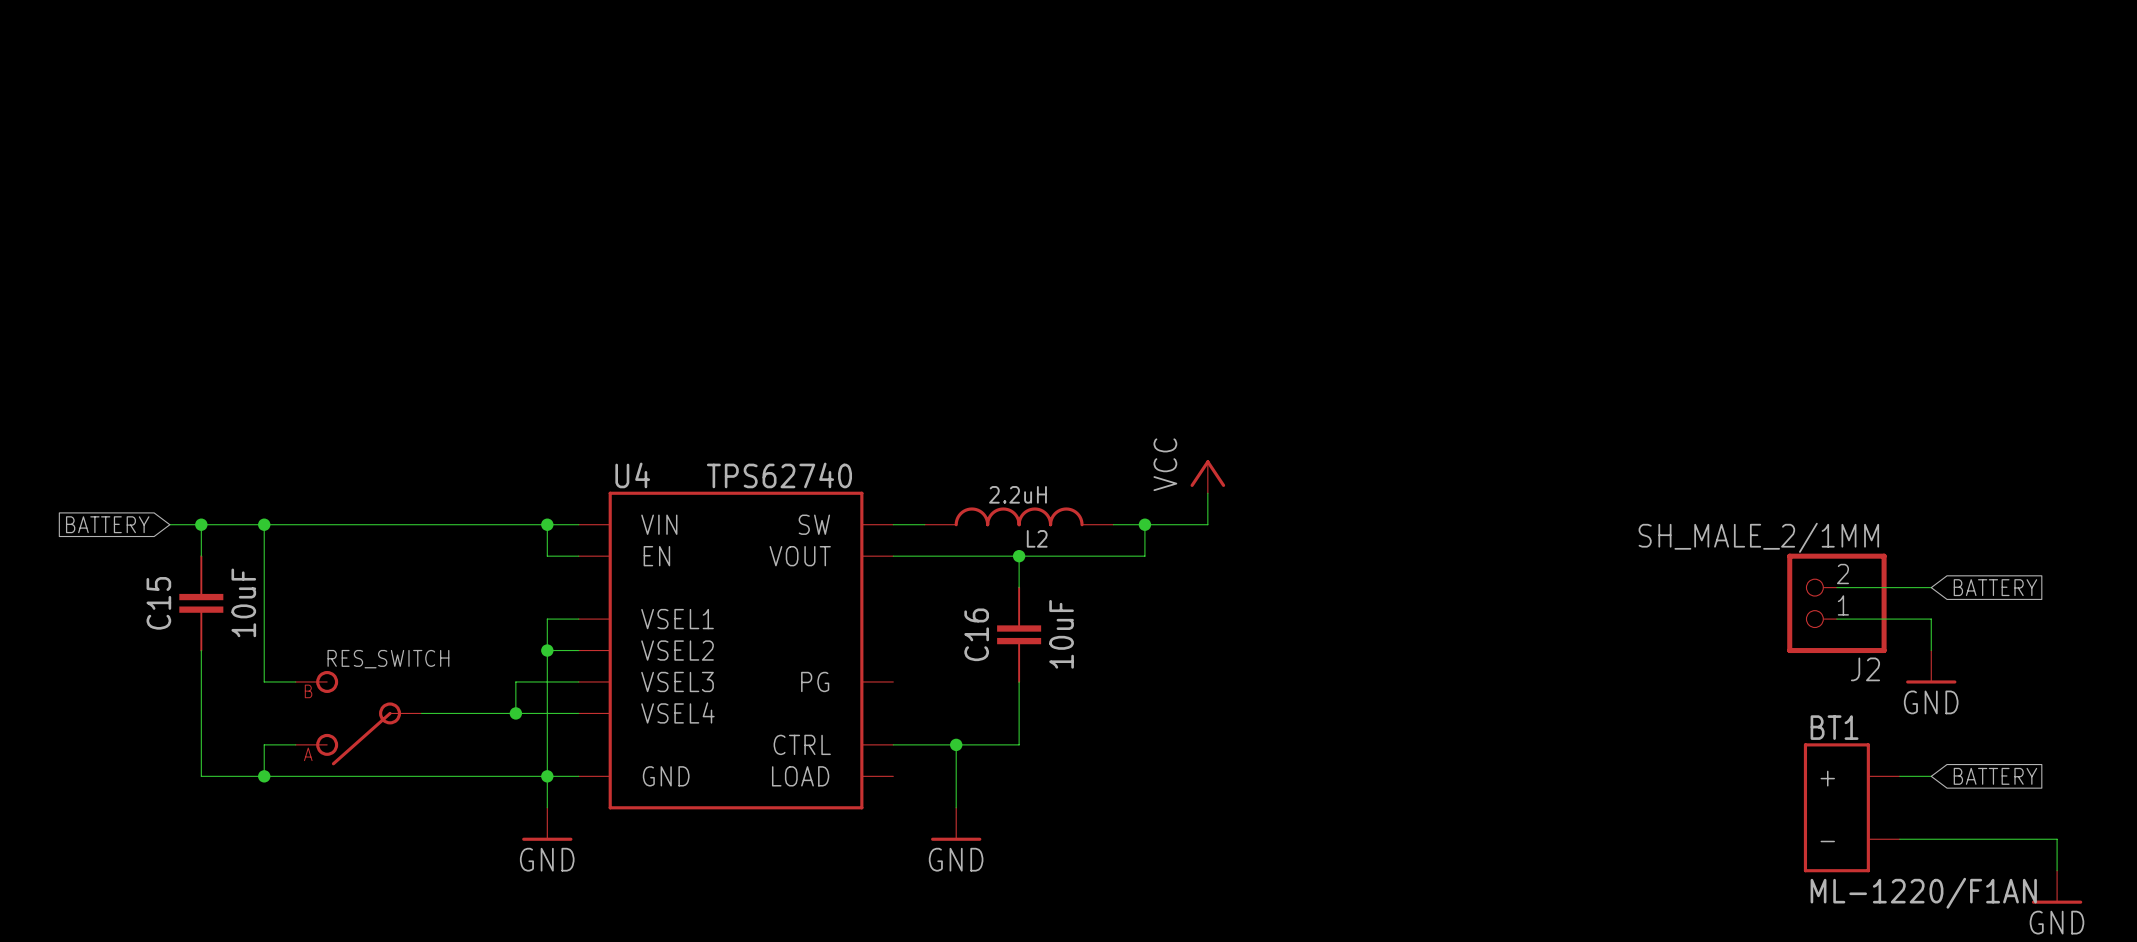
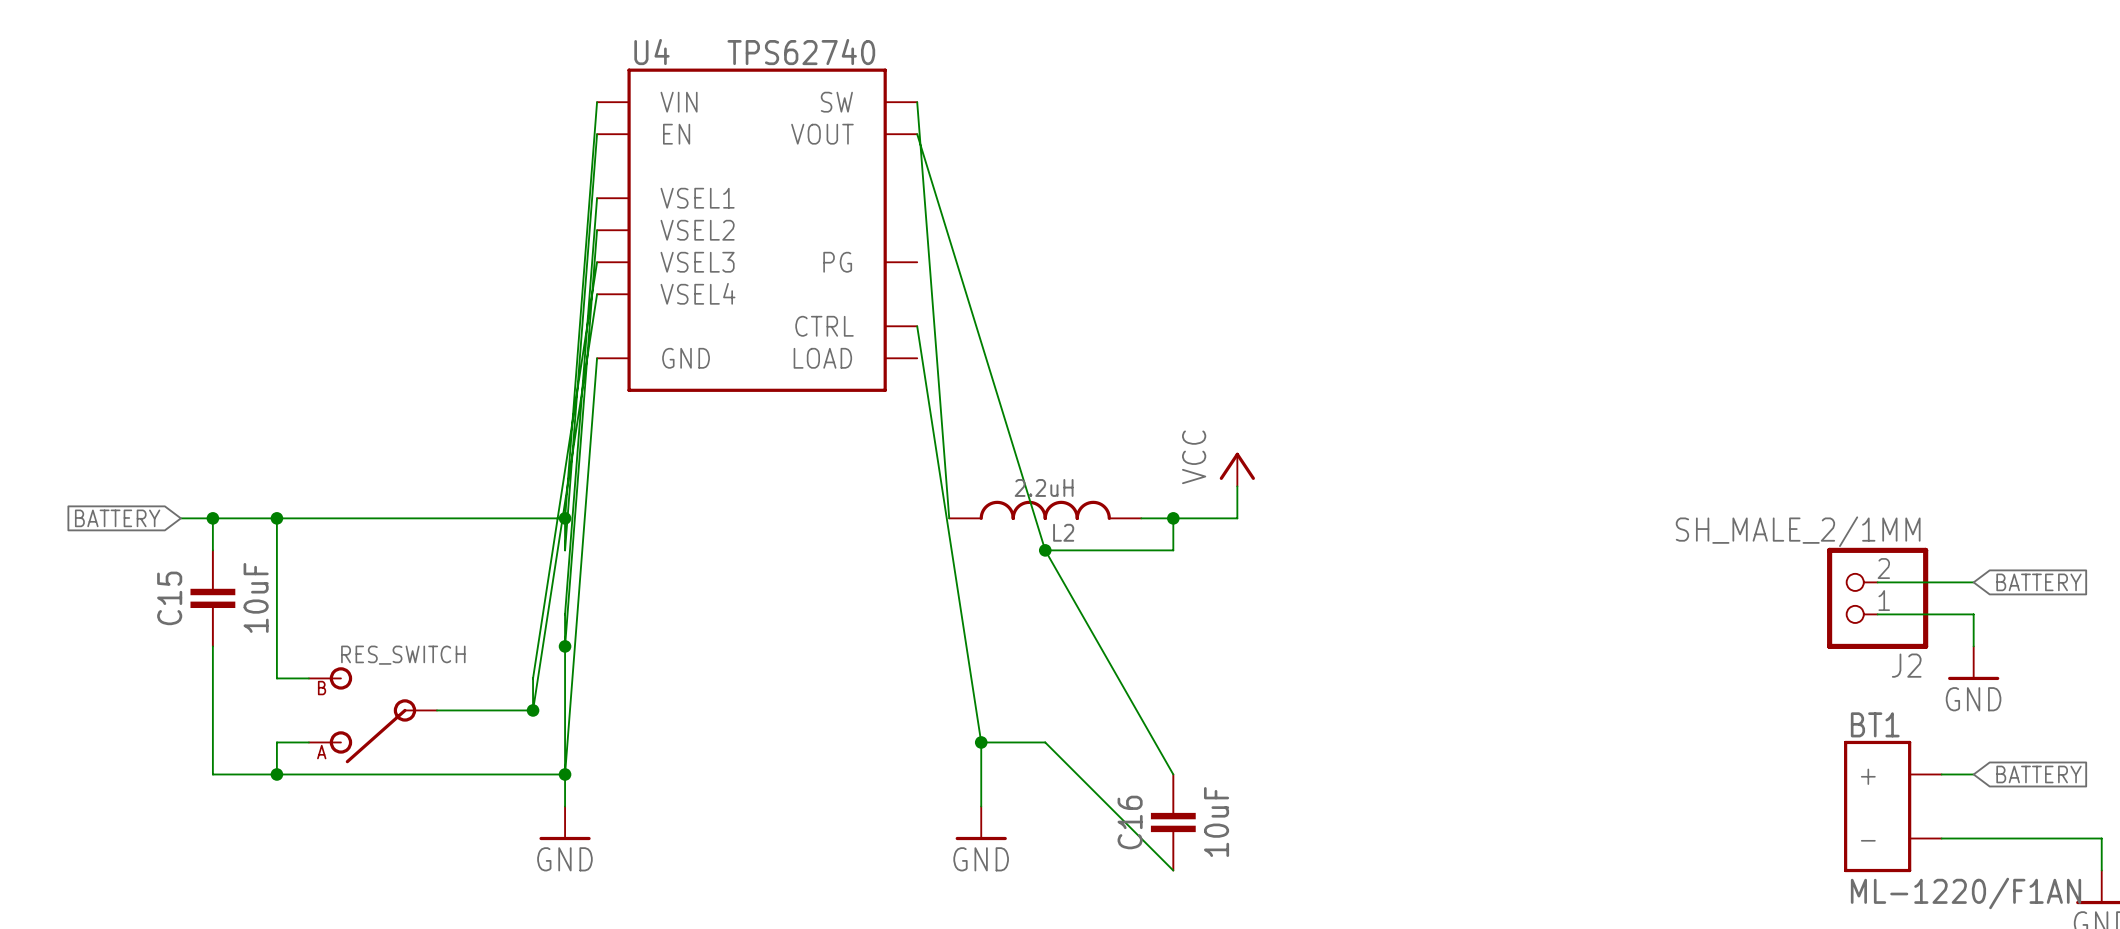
wire: none -> (917, 134) (1045, 550) (1173, 774)
wire: (547, 524) (578, 524) -> (565, 518) (597, 102)
wire: (893, 524) (924, 524) -> (917, 102) (949, 518)
wire: (547, 556) (578, 556) -> (565, 550) (597, 134)
wire: (893, 556) (1019, 556) (1019, 587) -> none
wire: (547, 619) (578, 619) -> (565, 614) (597, 198)
C16 position: (1019, 634) -> (1173, 822)
wire: (547, 650) (578, 650) -> (565, 646) (597, 230)
U4 position: (736, 650) -> (757, 230)
wire: (515, 681) (578, 681) -> (533, 678) (597, 262)
wire: (1019, 681) (1019, 744) -> (1173, 870) (1045, 742)
wire: (515, 713) (578, 713) -> (533, 710) (597, 294)
wire: (893, 744) (956, 744) -> (917, 326) (981, 742)
wire: (547, 776) (578, 776) -> (565, 774) (597, 358)

